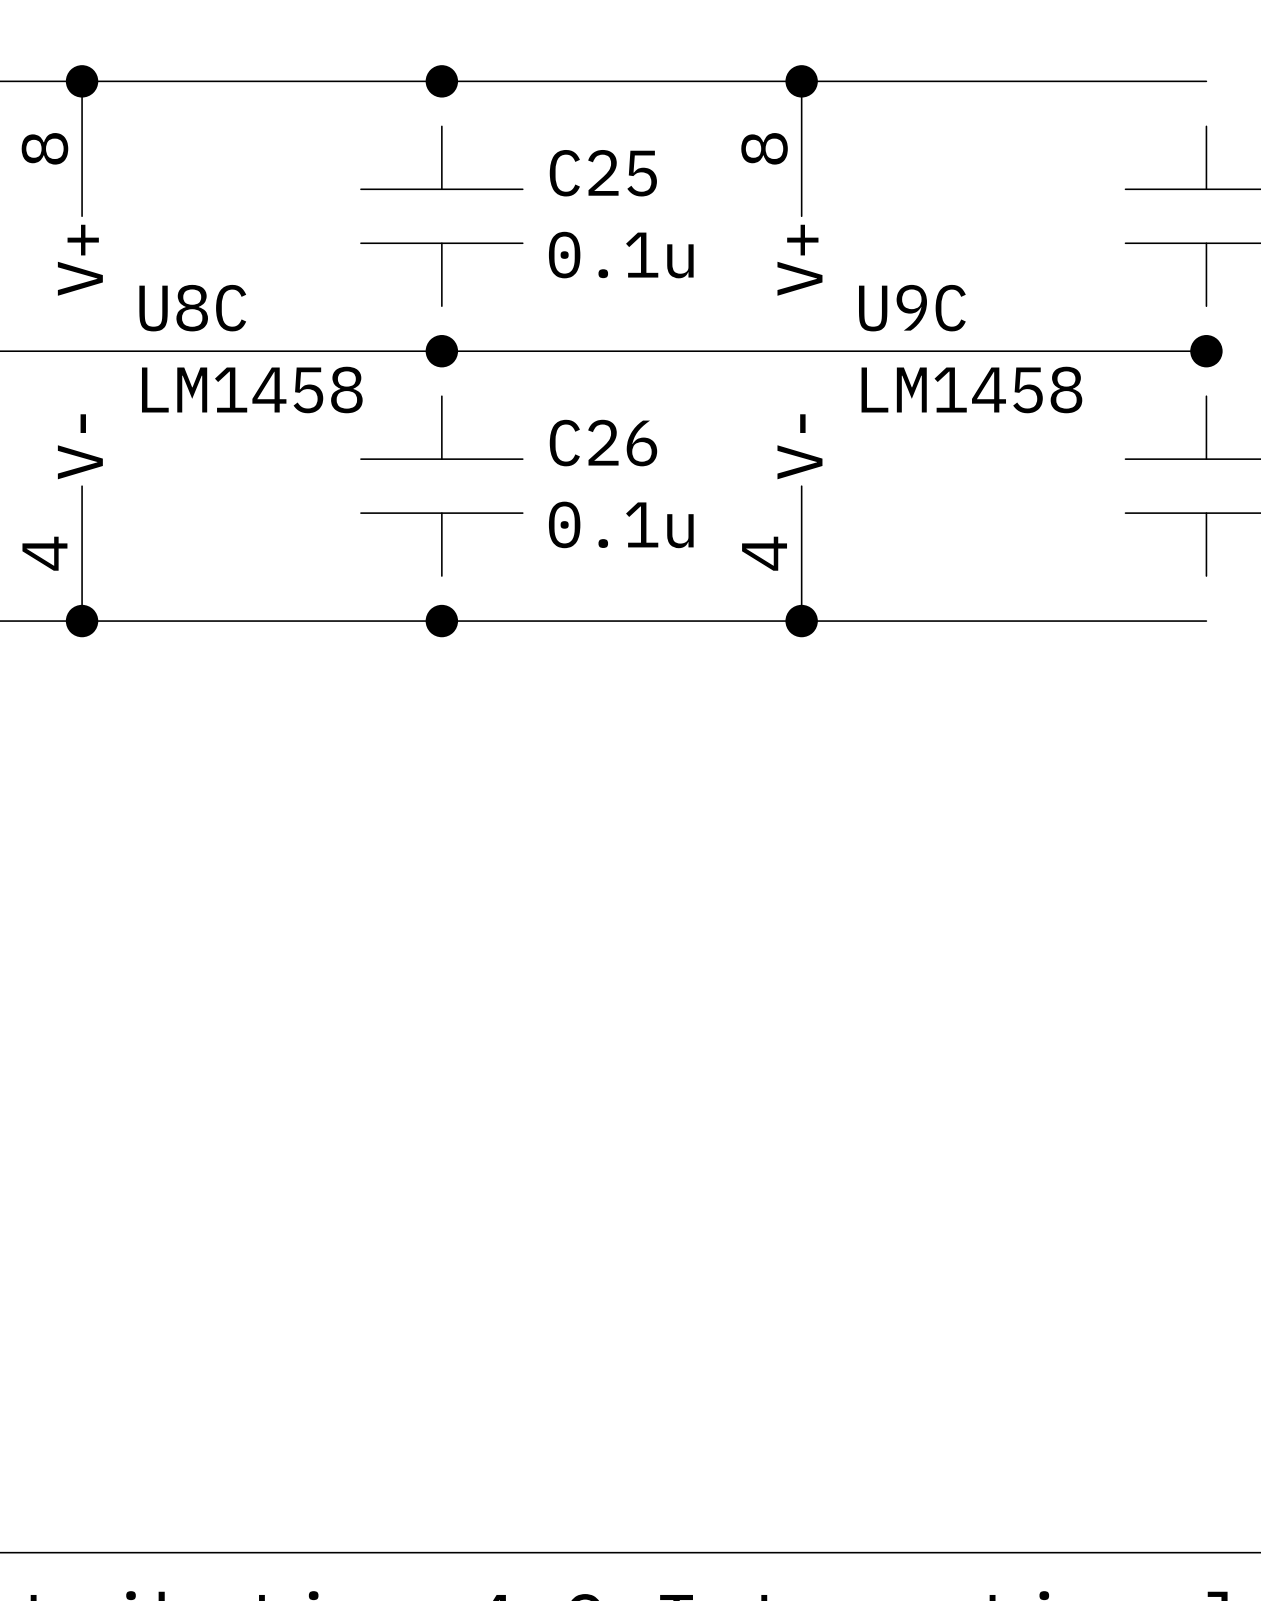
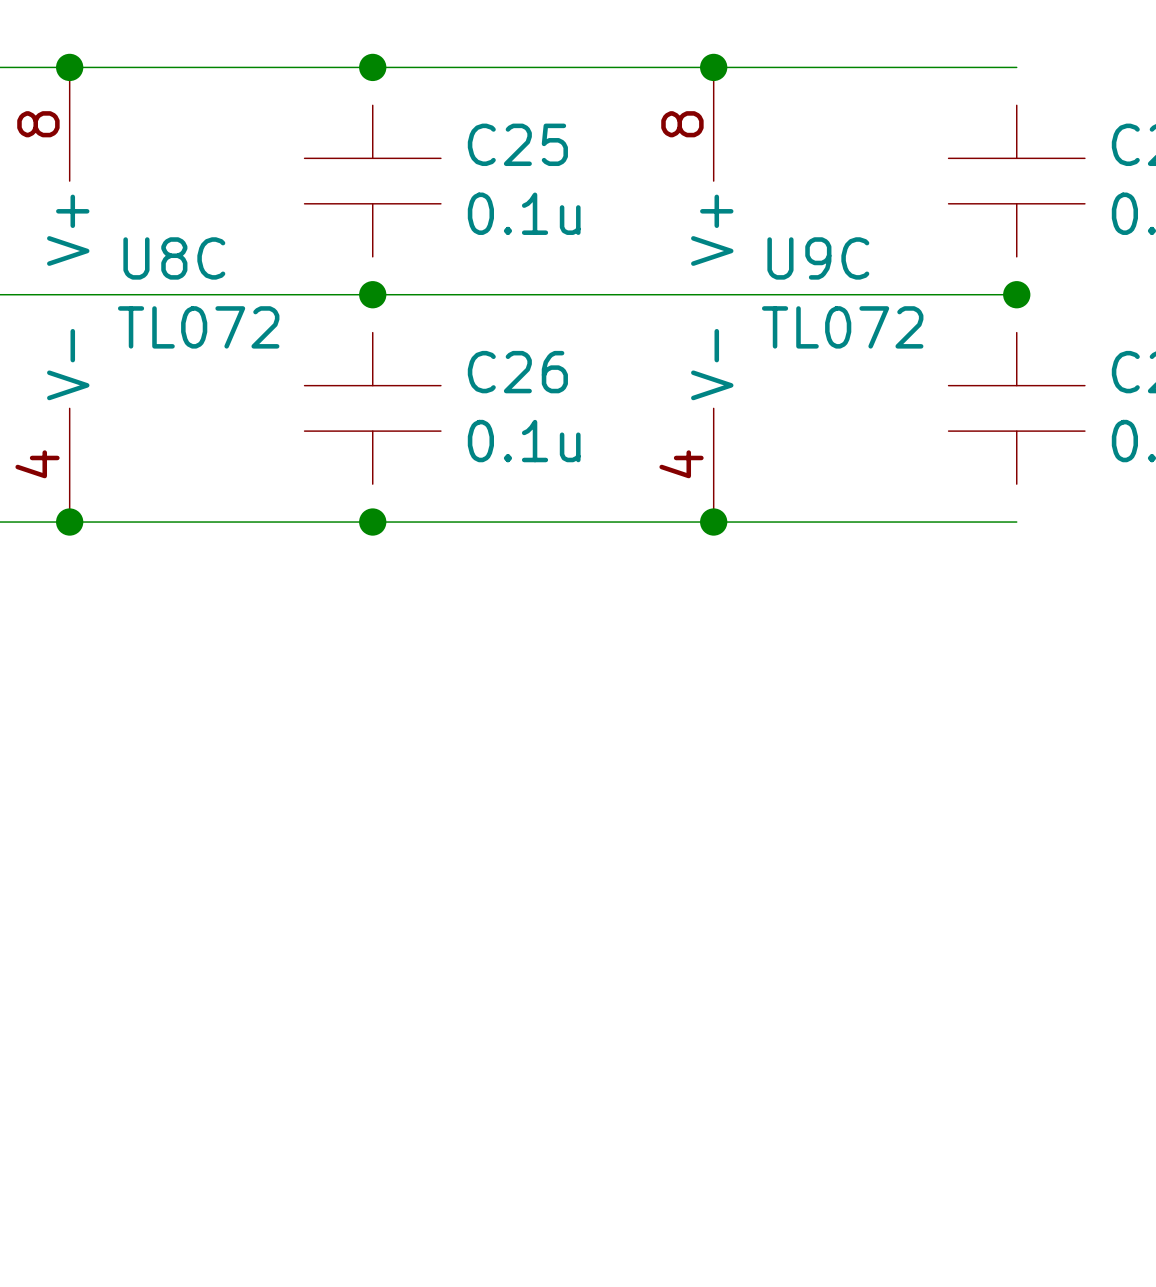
junction position: (801, 81) -> (713, 67)
U9C position: (801, 351) -> (713, 294)
U8C value: LM1458 (252, 390) -> TL072 (198, 327)
U9C value: LM1458 (971, 390) -> TL072 (842, 327)
junction position: (801, 621) -> (713, 522)

